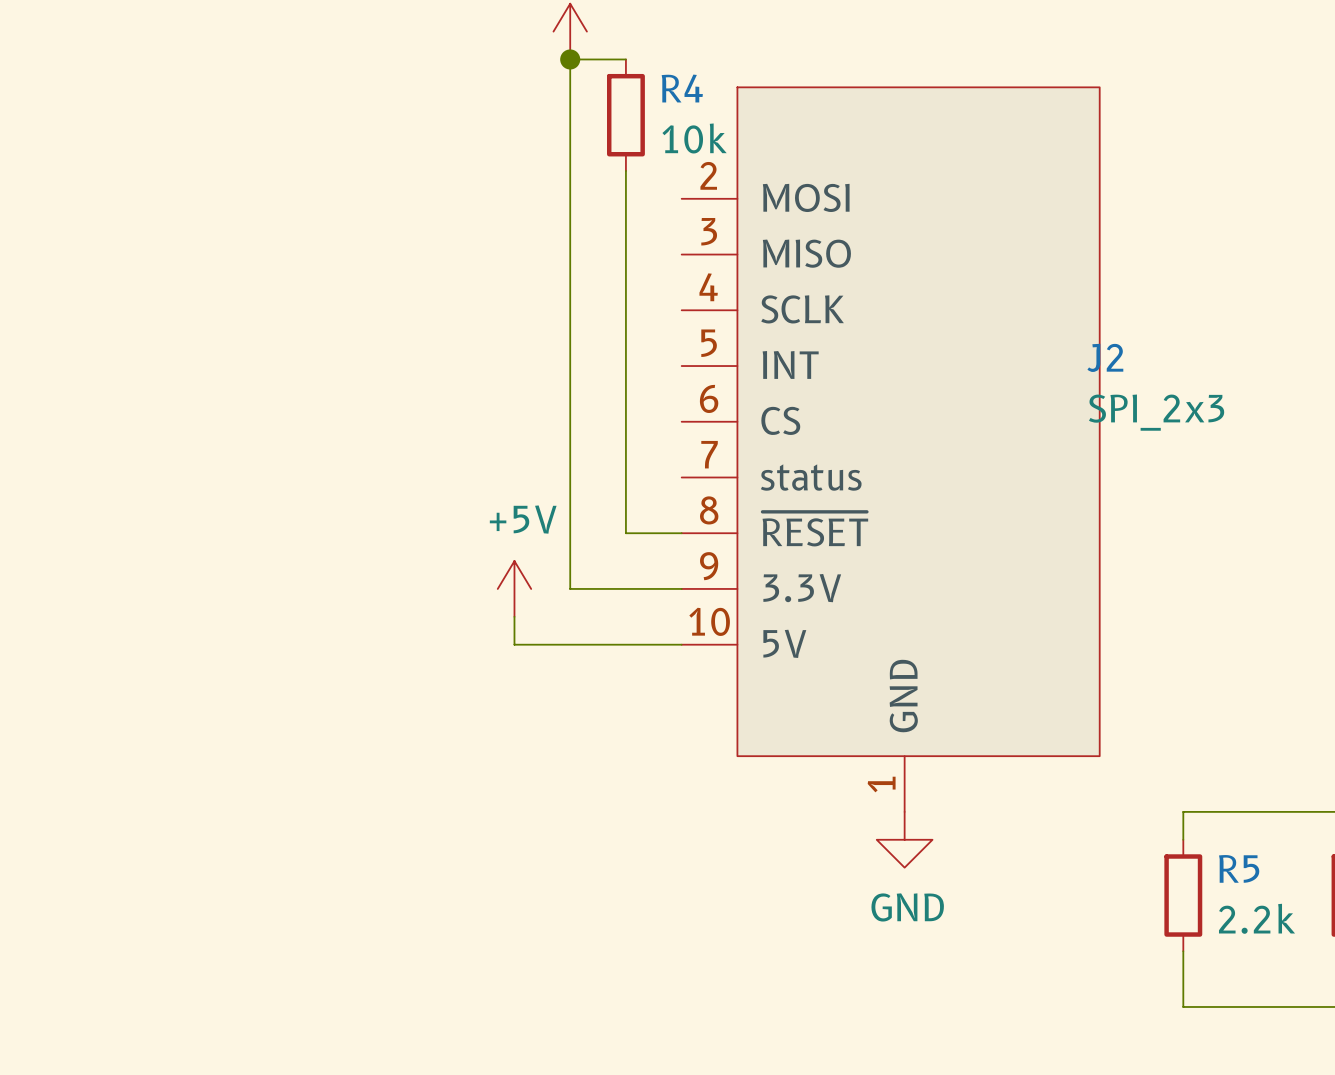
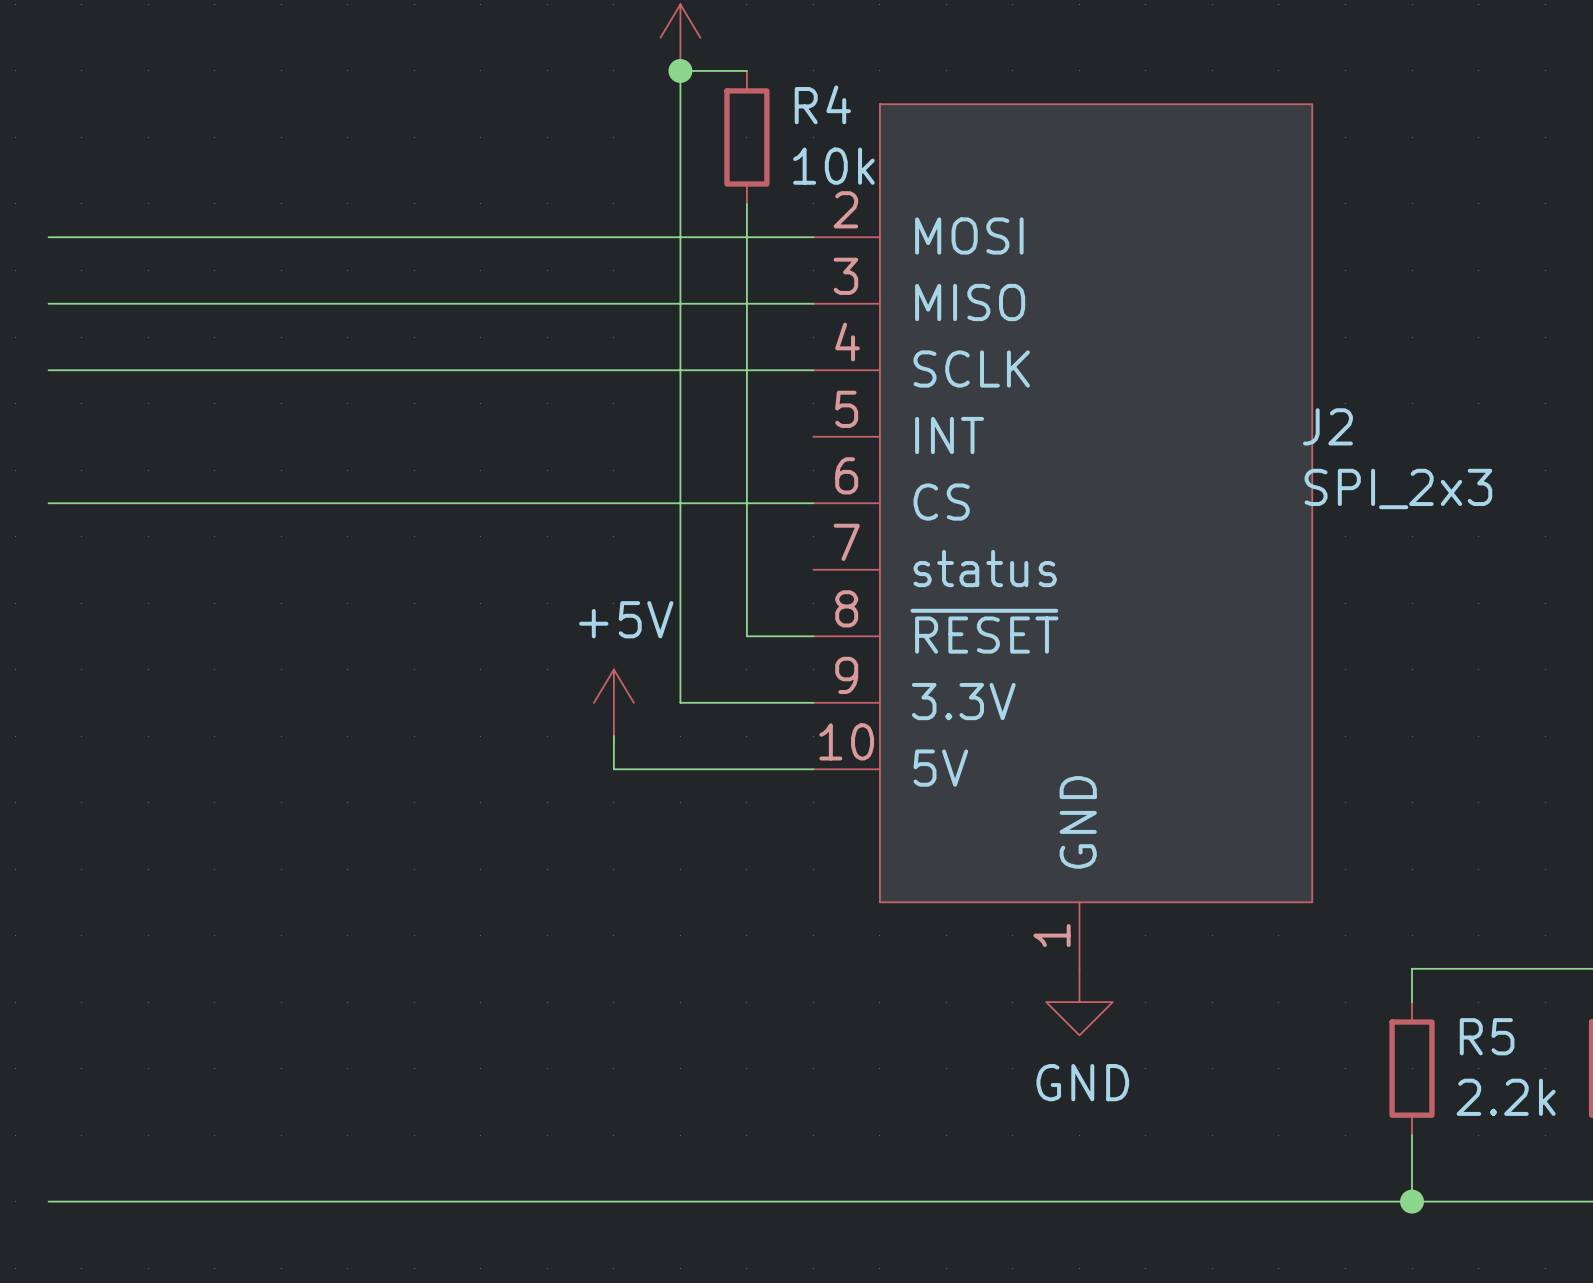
wire: none -> (48, 237) (813, 237)
wire: none -> (48, 303) (813, 303)
wire: none -> (48, 370) (813, 370)
wire: none -> (48, 503) (813, 503)
wire: none -> (48, 1201) (1412, 1201)
junction: none -> (1412, 1201)

